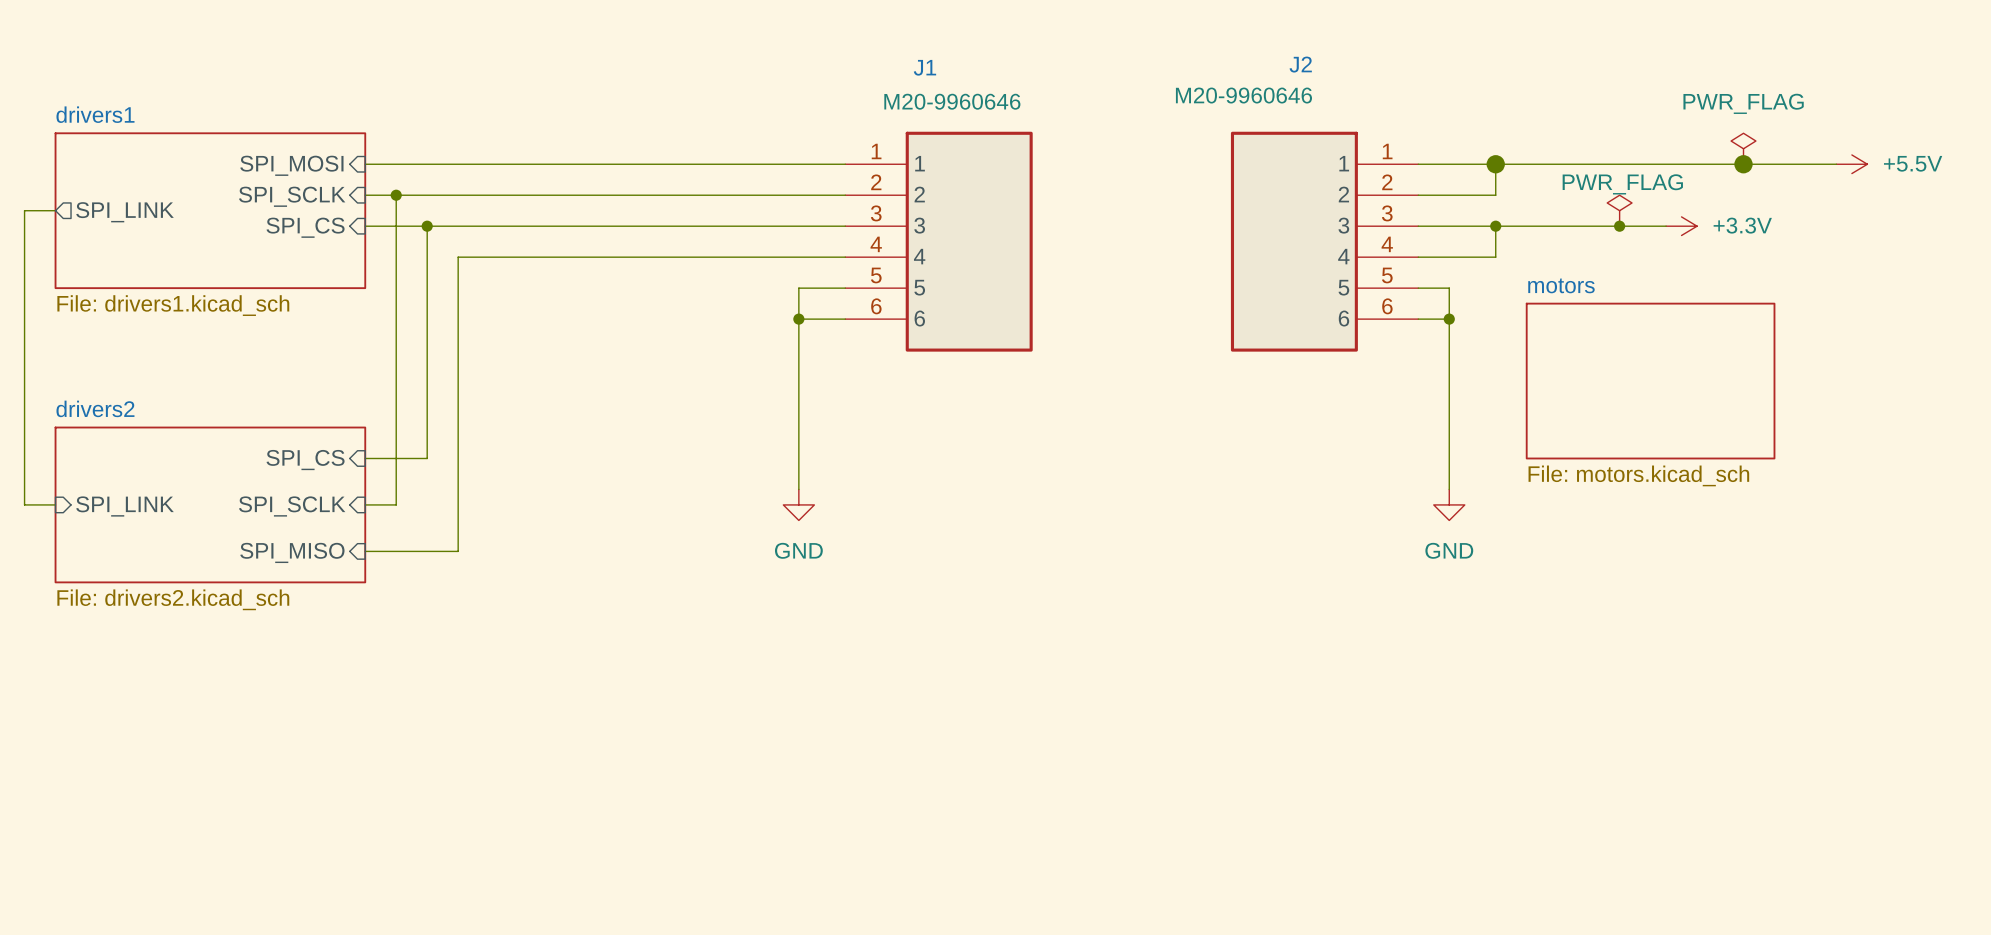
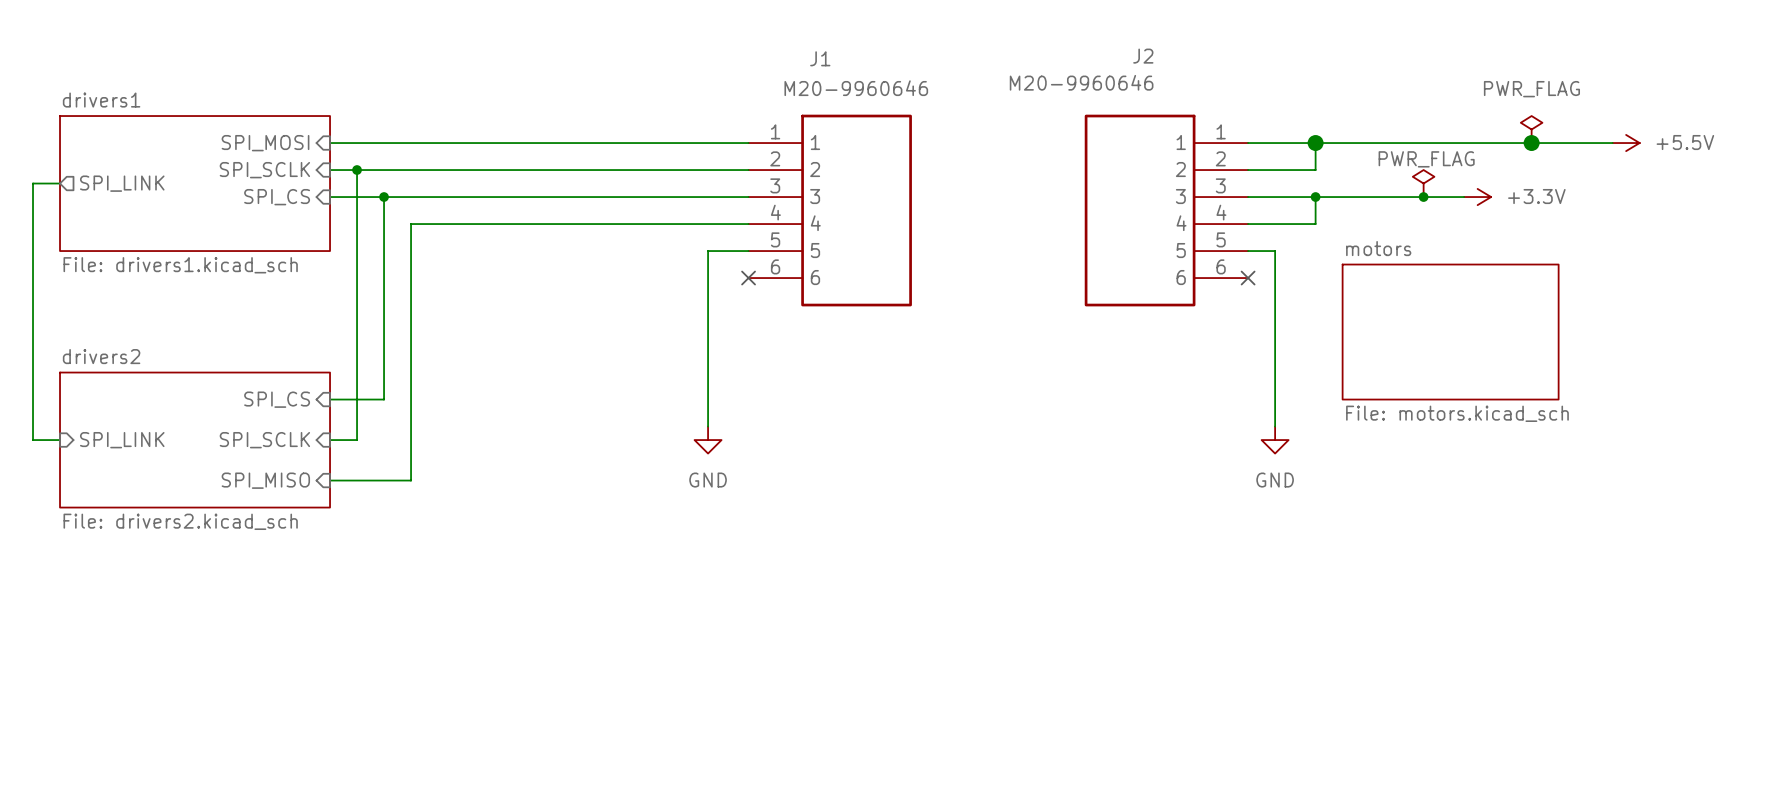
wire: (798, 319) (845, 319) -> none
junction: (798, 319) -> none
no-connect mark: none -> (748, 278)
wire: (1418, 319) (1449, 319) -> none
no-connect mark: none -> (1248, 278)
junction: (1449, 319) -> none

